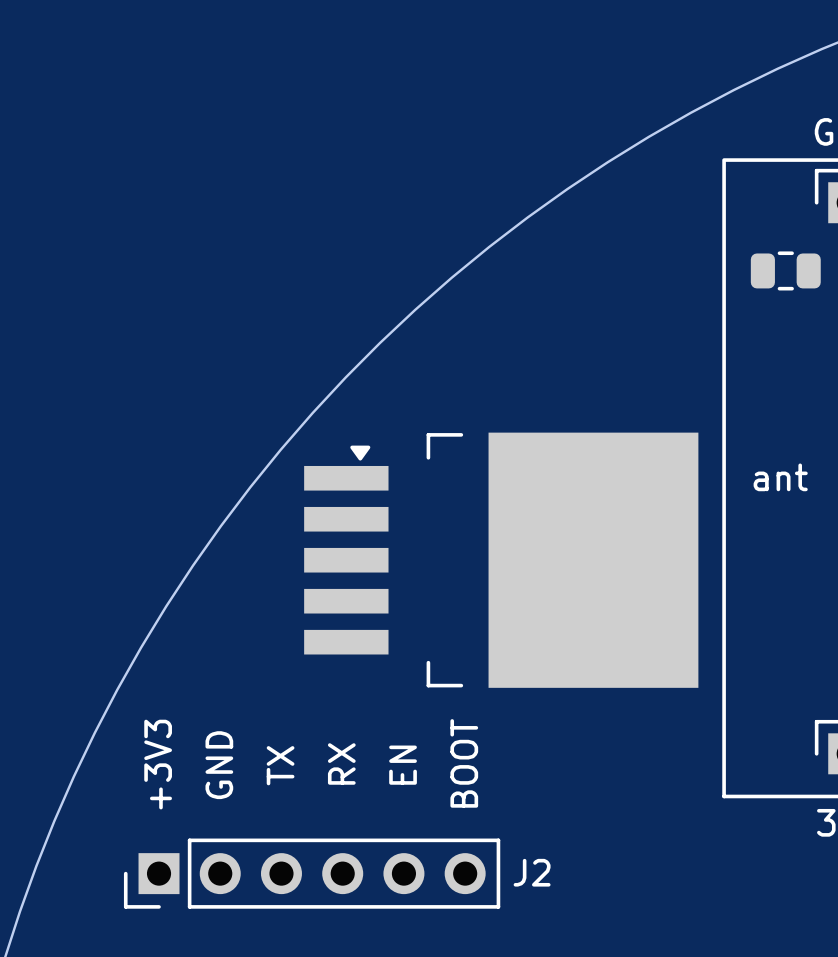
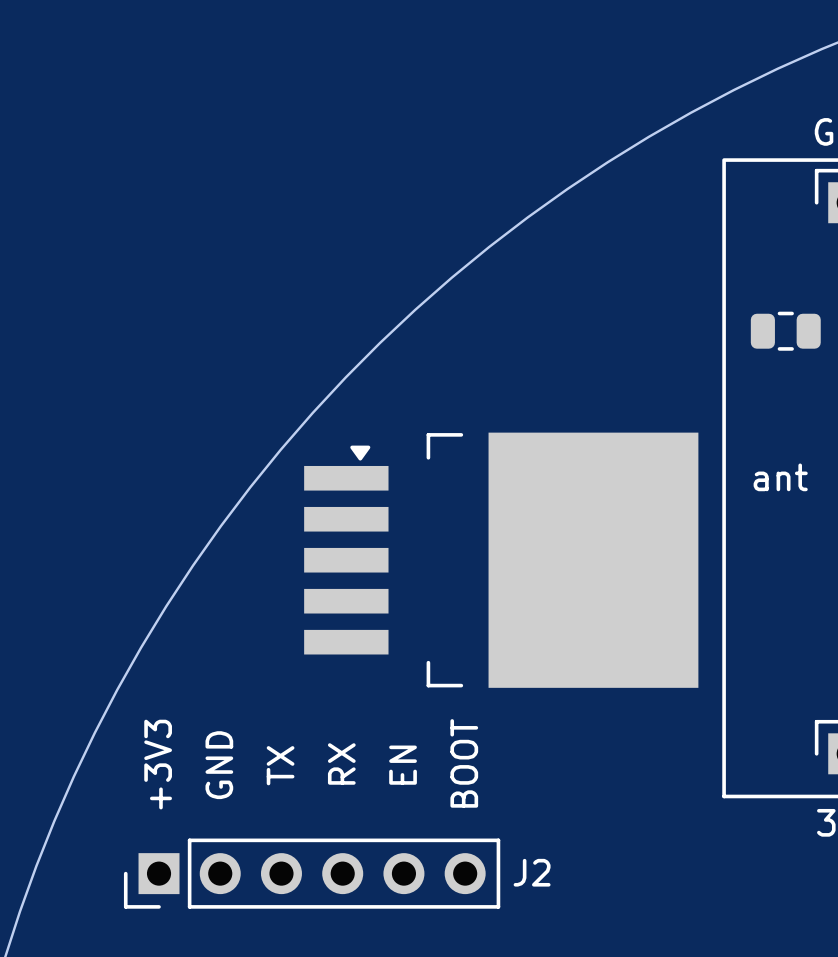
part position: (785, 270) -> (785, 331)

